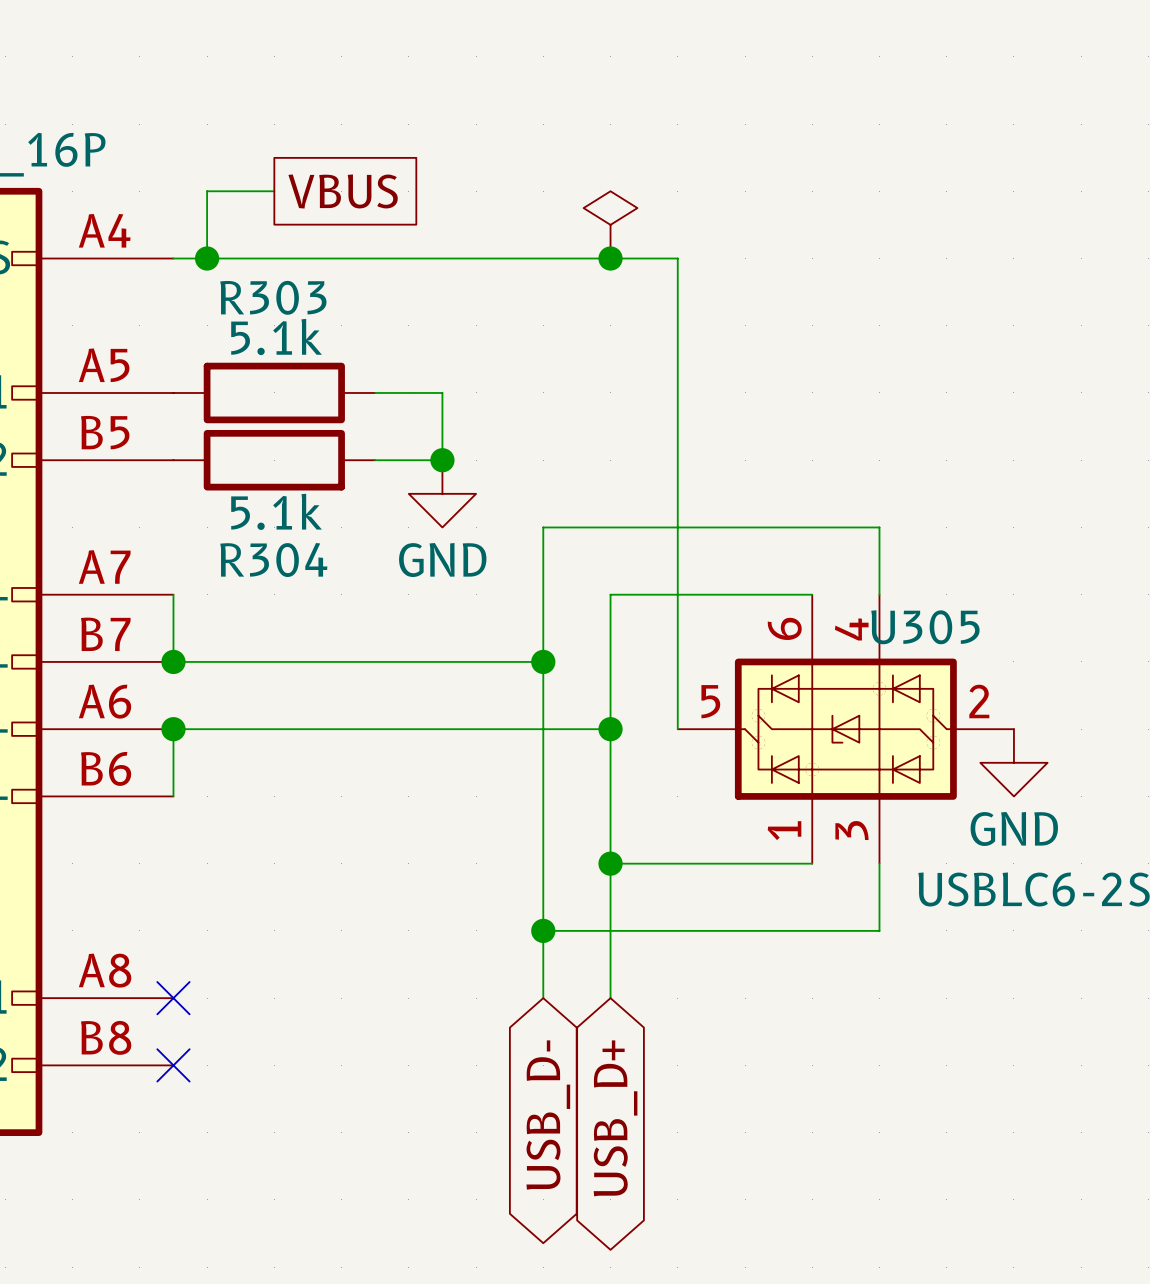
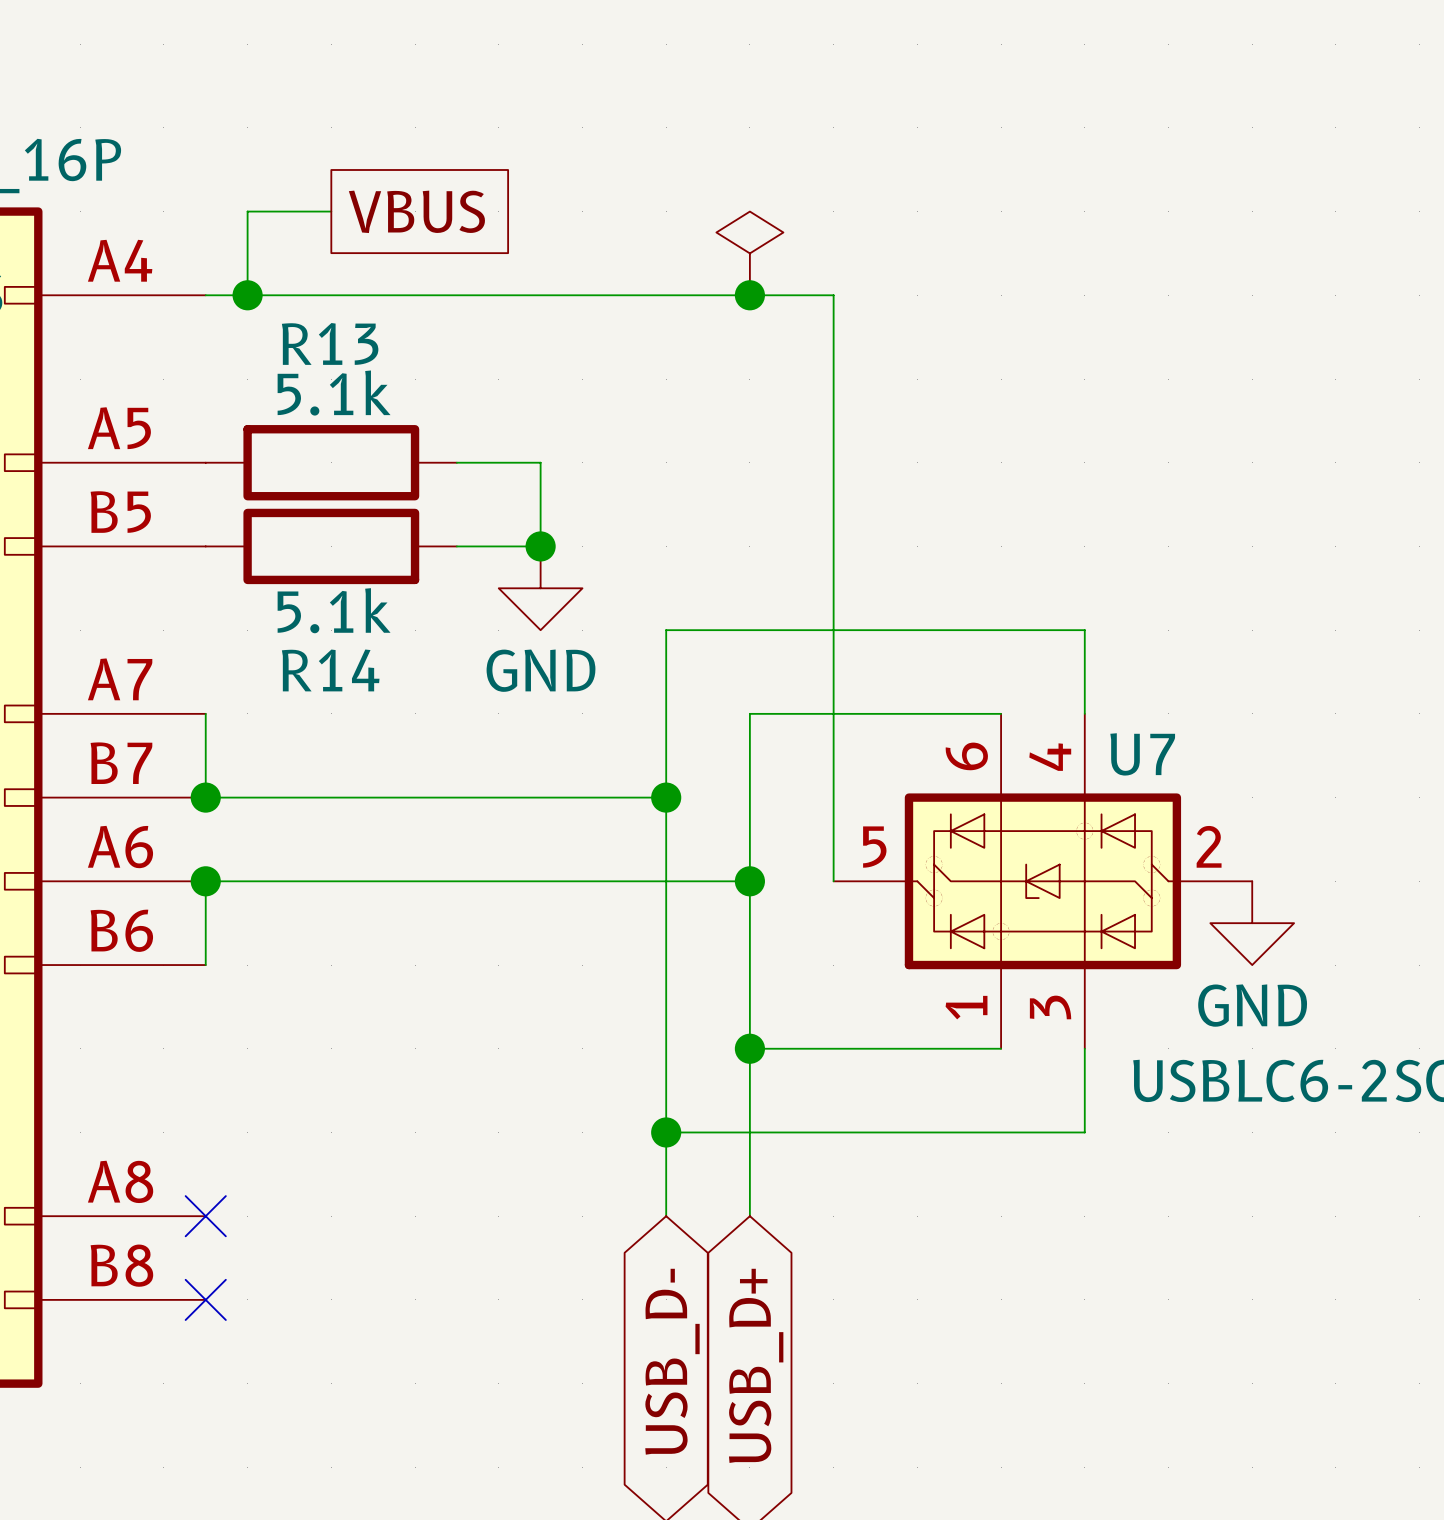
R303 name: R303 (273, 297) -> R13 (330, 343)
R304 name: R304 (273, 560) -> R14 (330, 670)
U305 name: U305 (925, 627) -> U7 (1142, 754)

